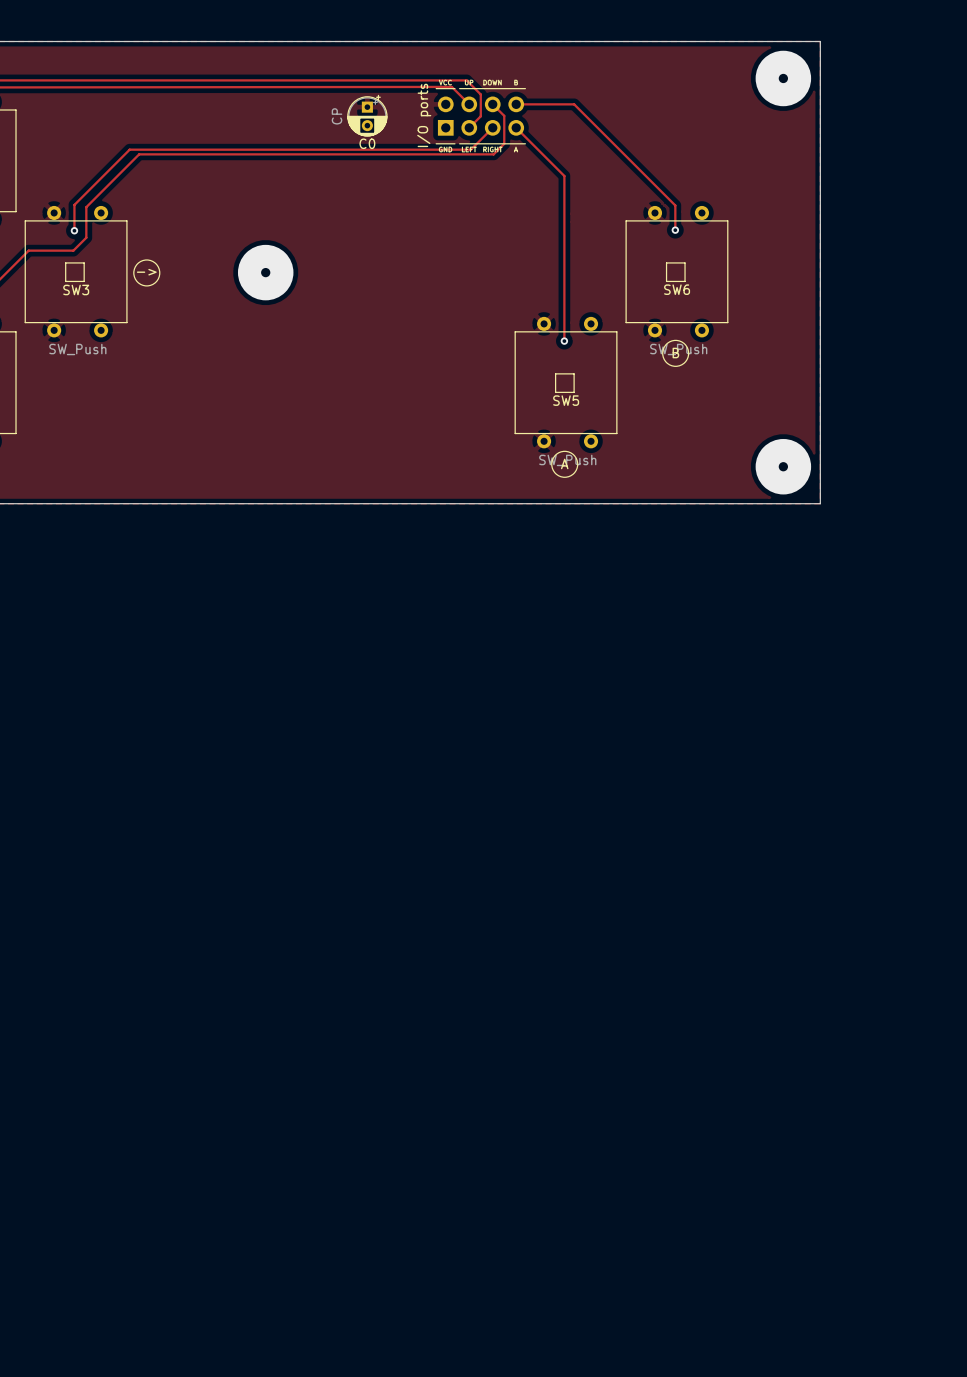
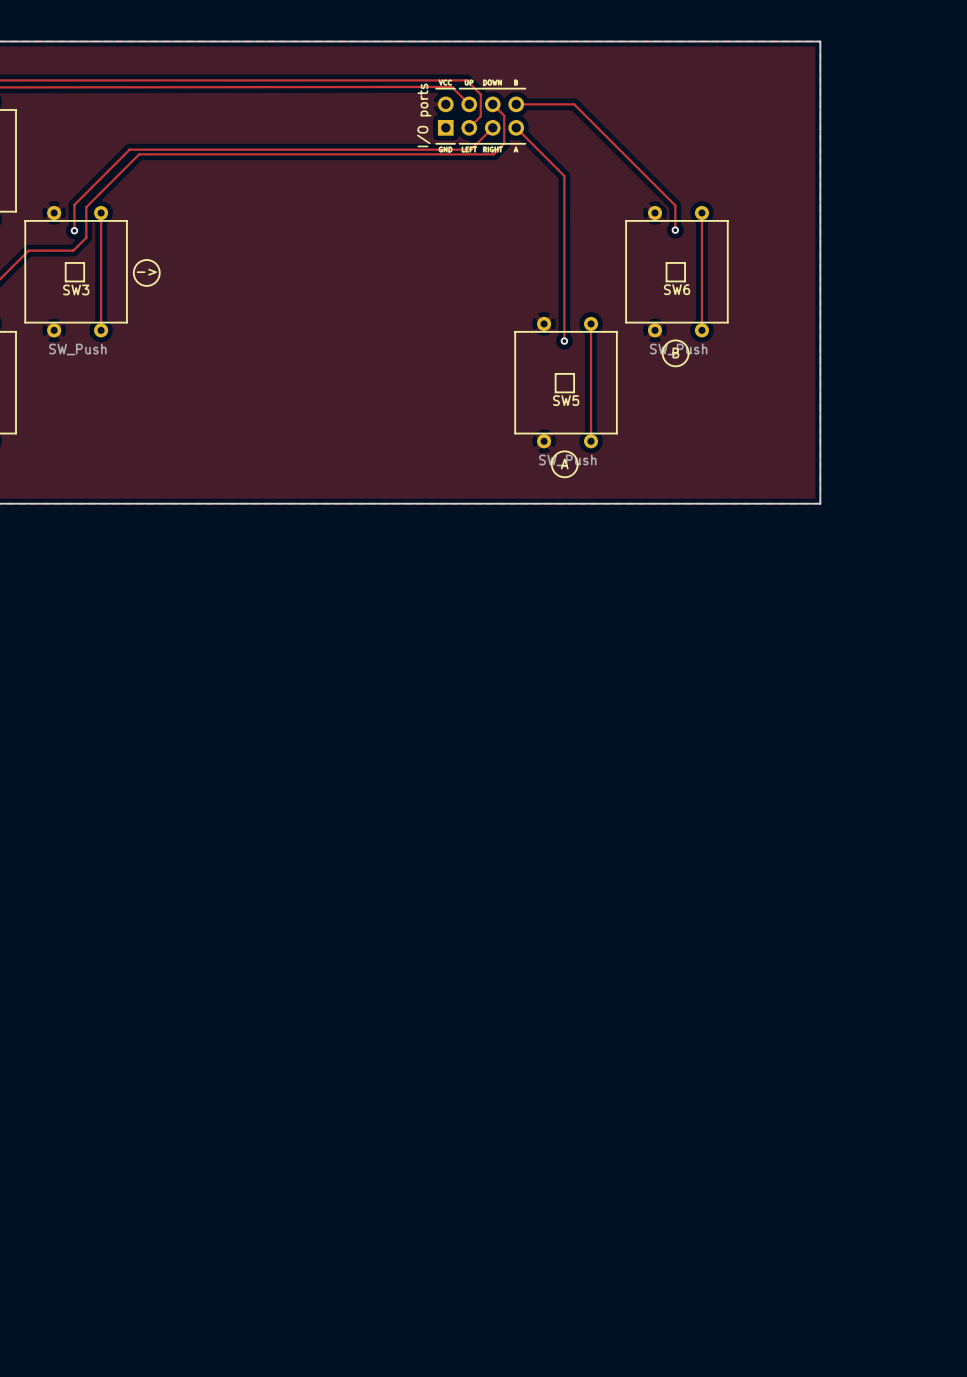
via: (783, 78) -> none
C0: CP (367, 115) -> none
track: none -> (101, 212) (101, 330)
track: none -> (701, 212) (701, 330)
via: (265, 272) -> none
track: none -> (591, 323) (591, 441)
via: (783, 466) -> none

